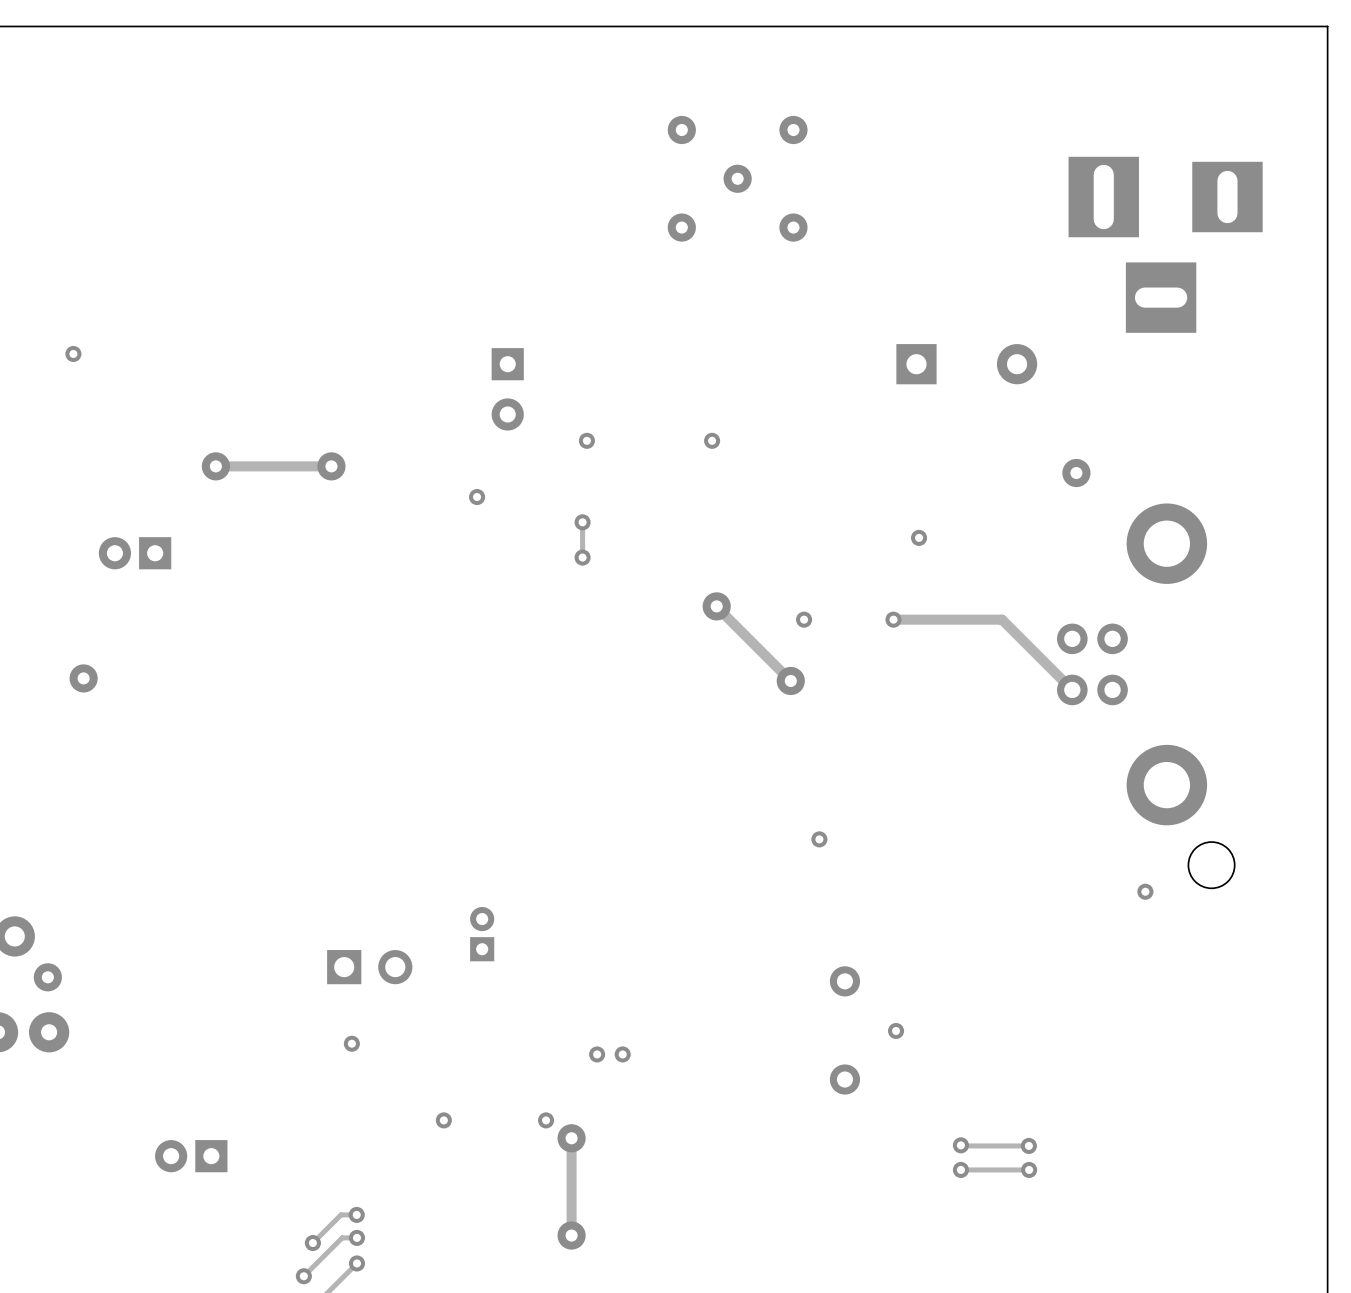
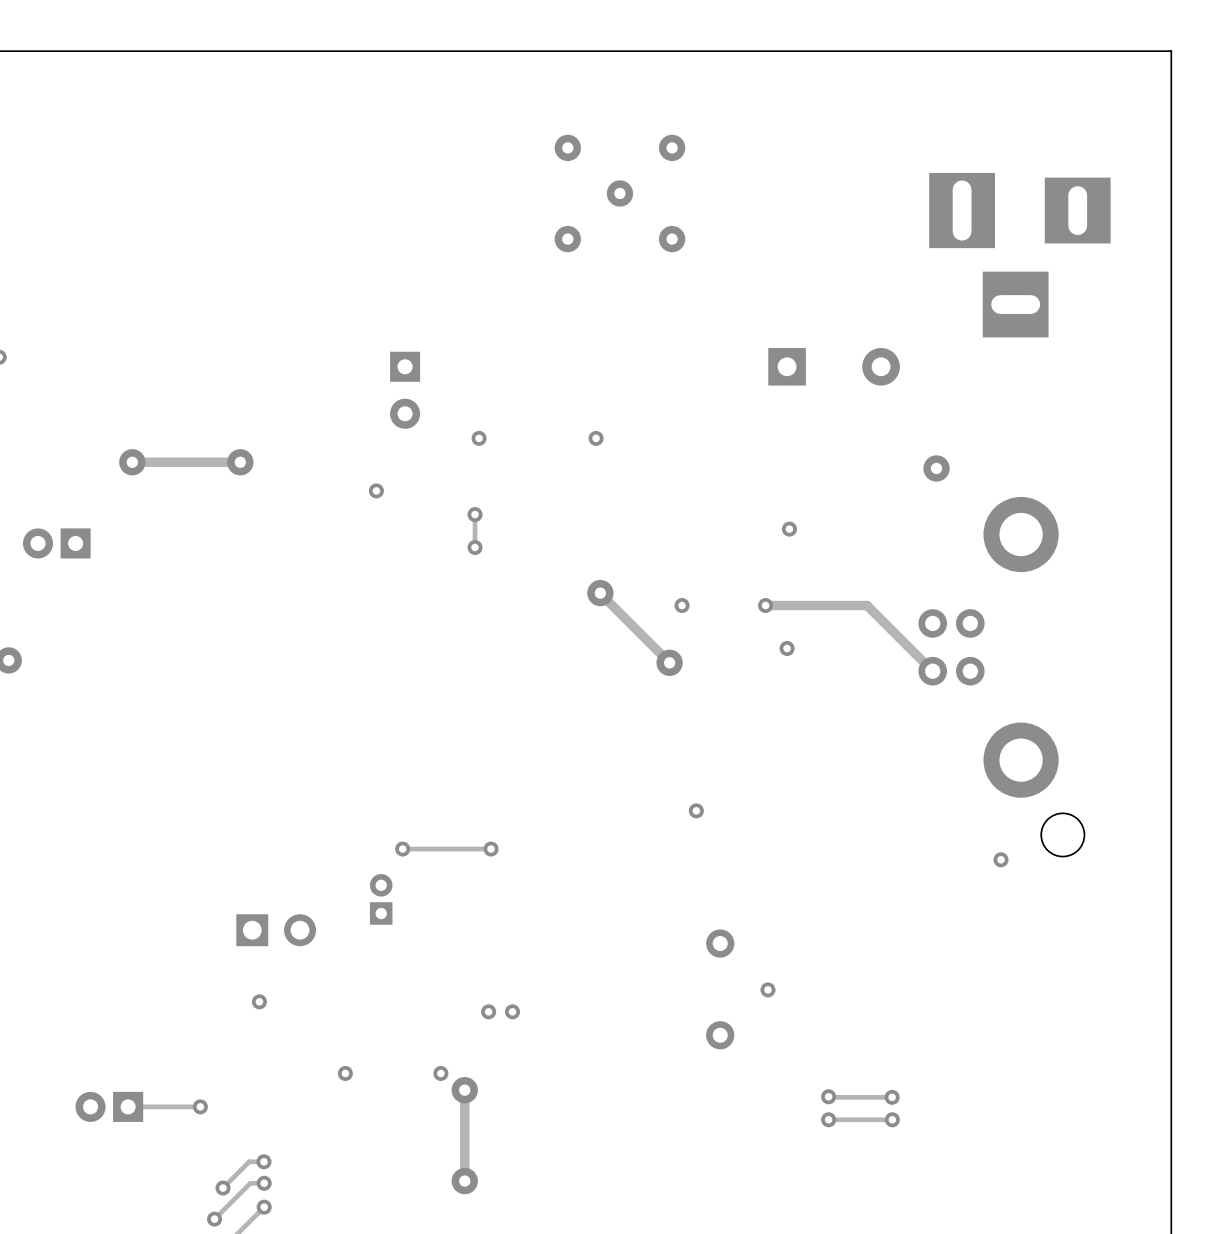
via: none -> (787, 648)
via: none -> (402, 849)
track: none -> (491, 849) (402, 849)
via: none -> (491, 849)
track: none -> (200, 1106) (128, 1106)
via: none -> (200, 1106)

